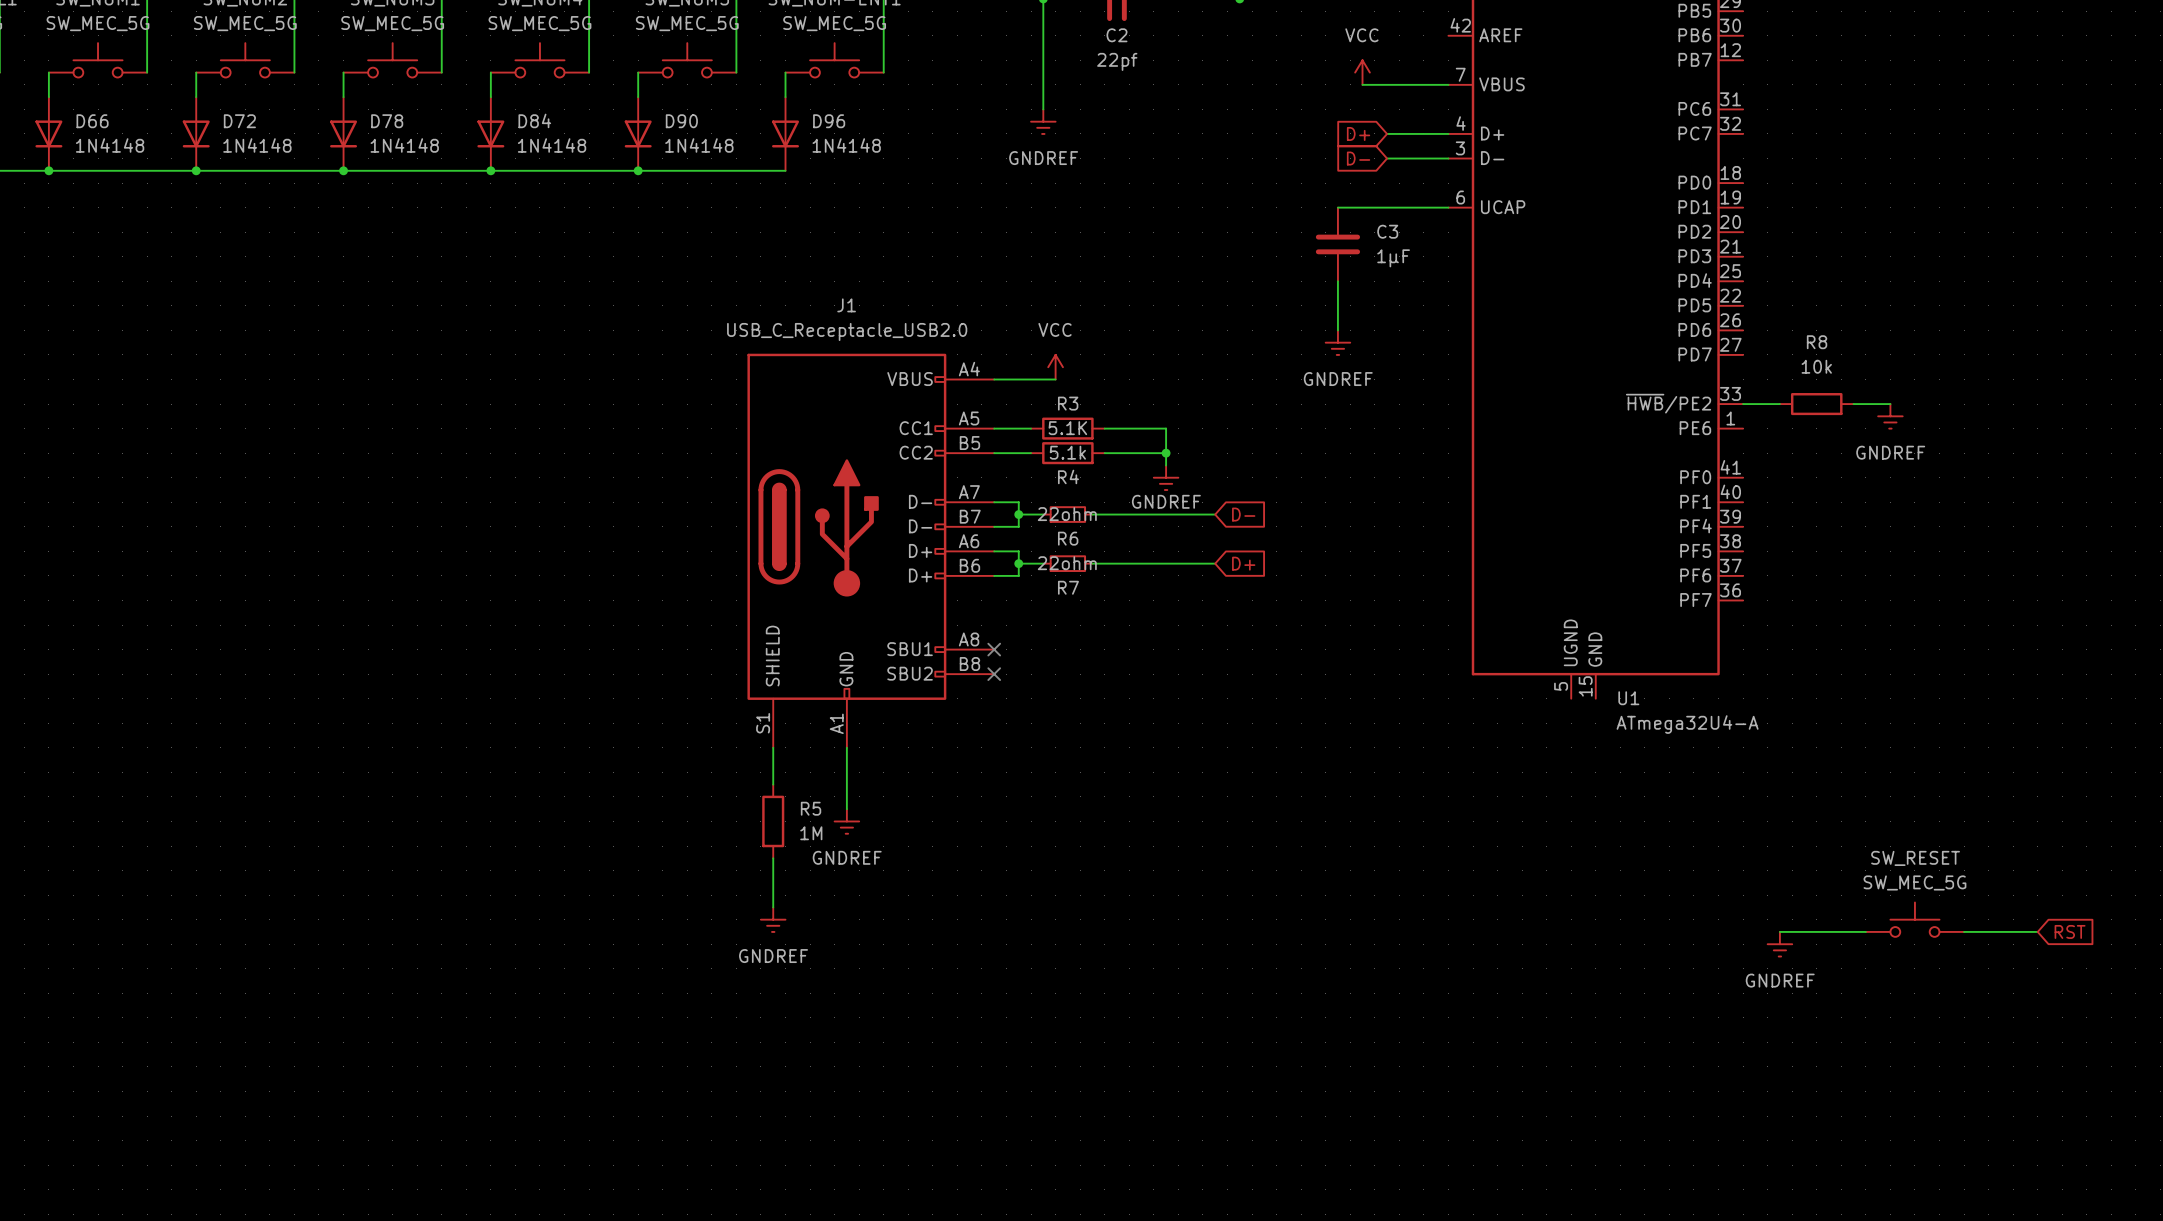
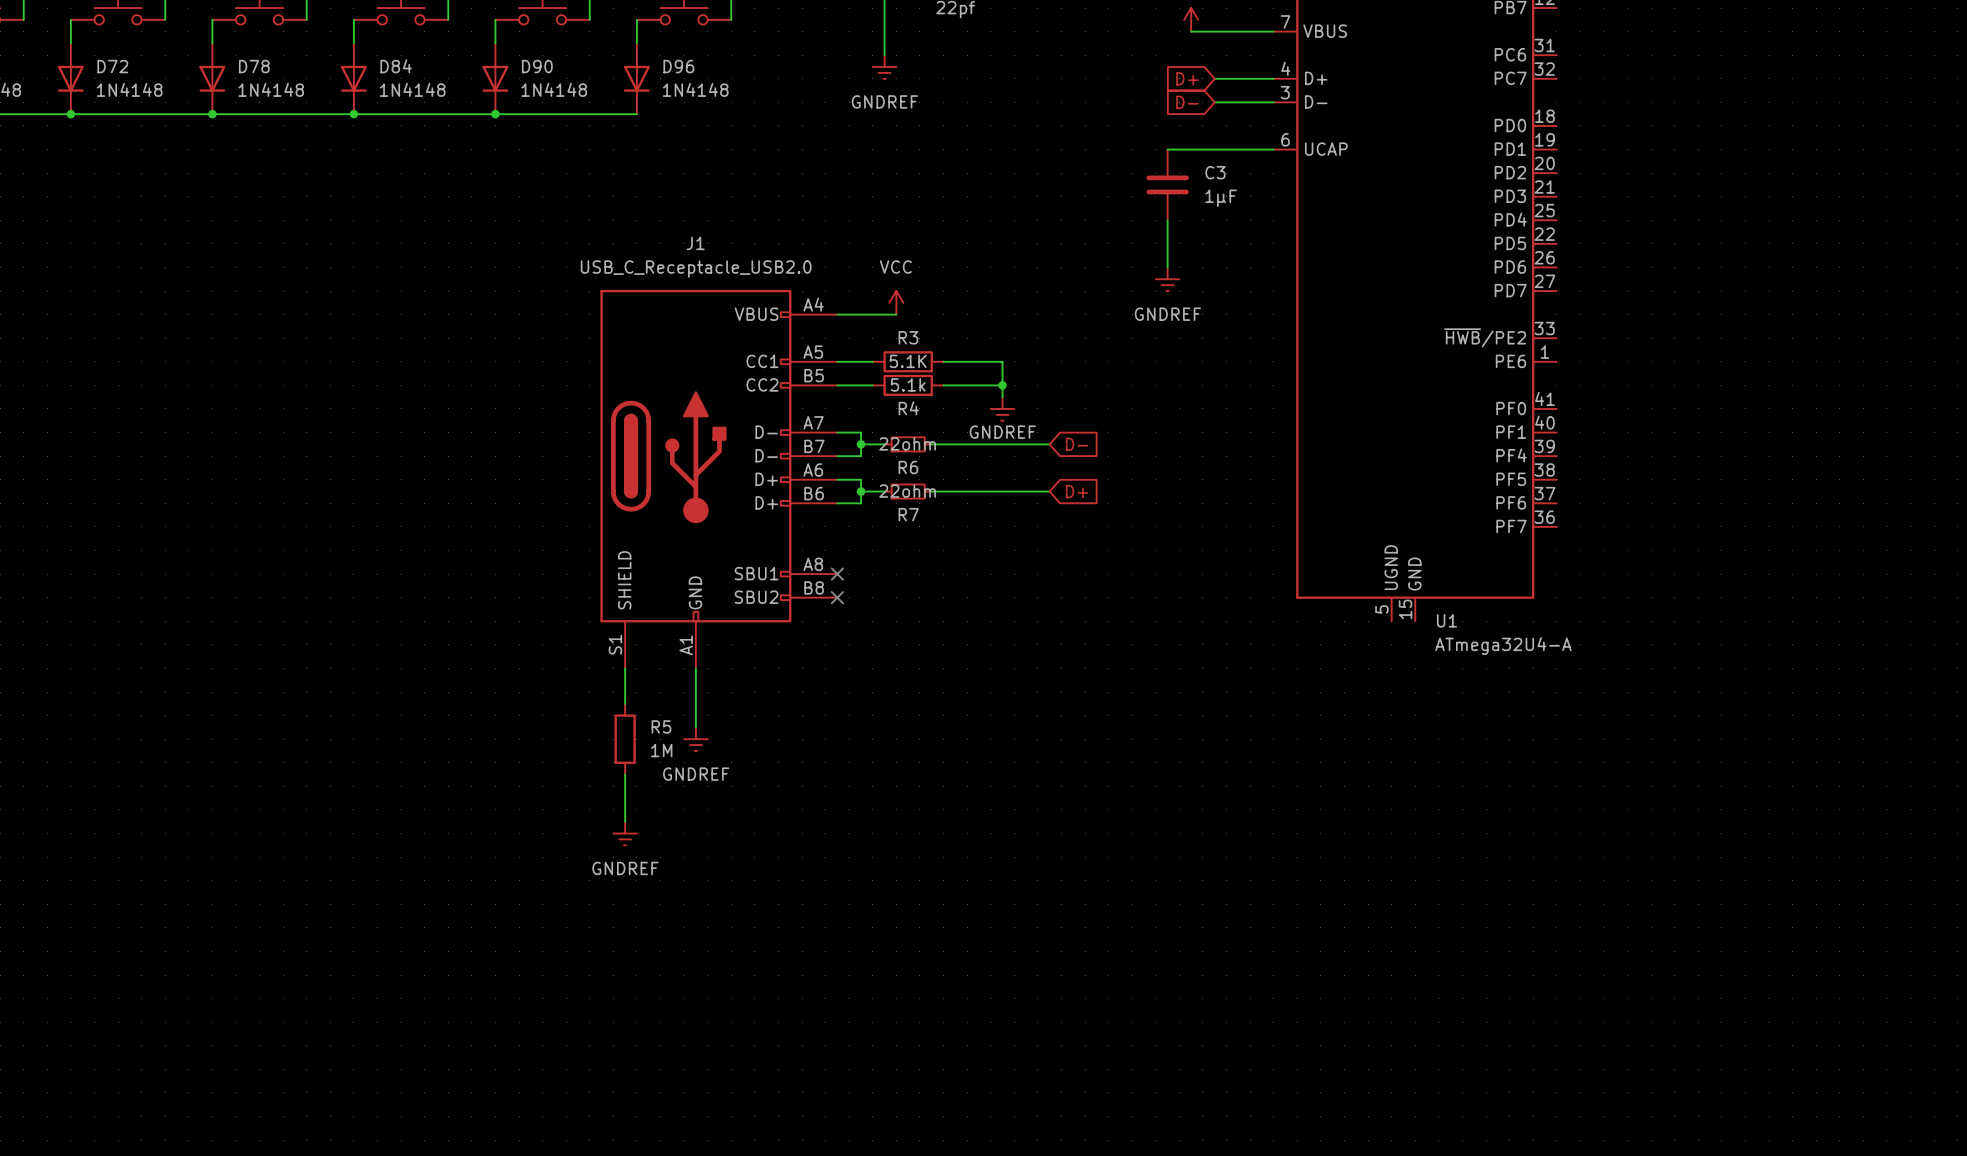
wire: (1743, 404) (1779, 404) -> none
R8: 10k (1816, 404) -> none
wire: (1853, 404) (1890, 404) -> none
power symbol: GNDREF (1890, 416) -> none
SW_RESET: SW_MEC_5G (1914, 919) -> none
wire: (1779, 931) (1865, 931) -> none
wire: (1964, 931) (2037, 931) -> none
global label: RST (2070, 931) -> none
power symbol: GNDREF (1779, 944) -> none

